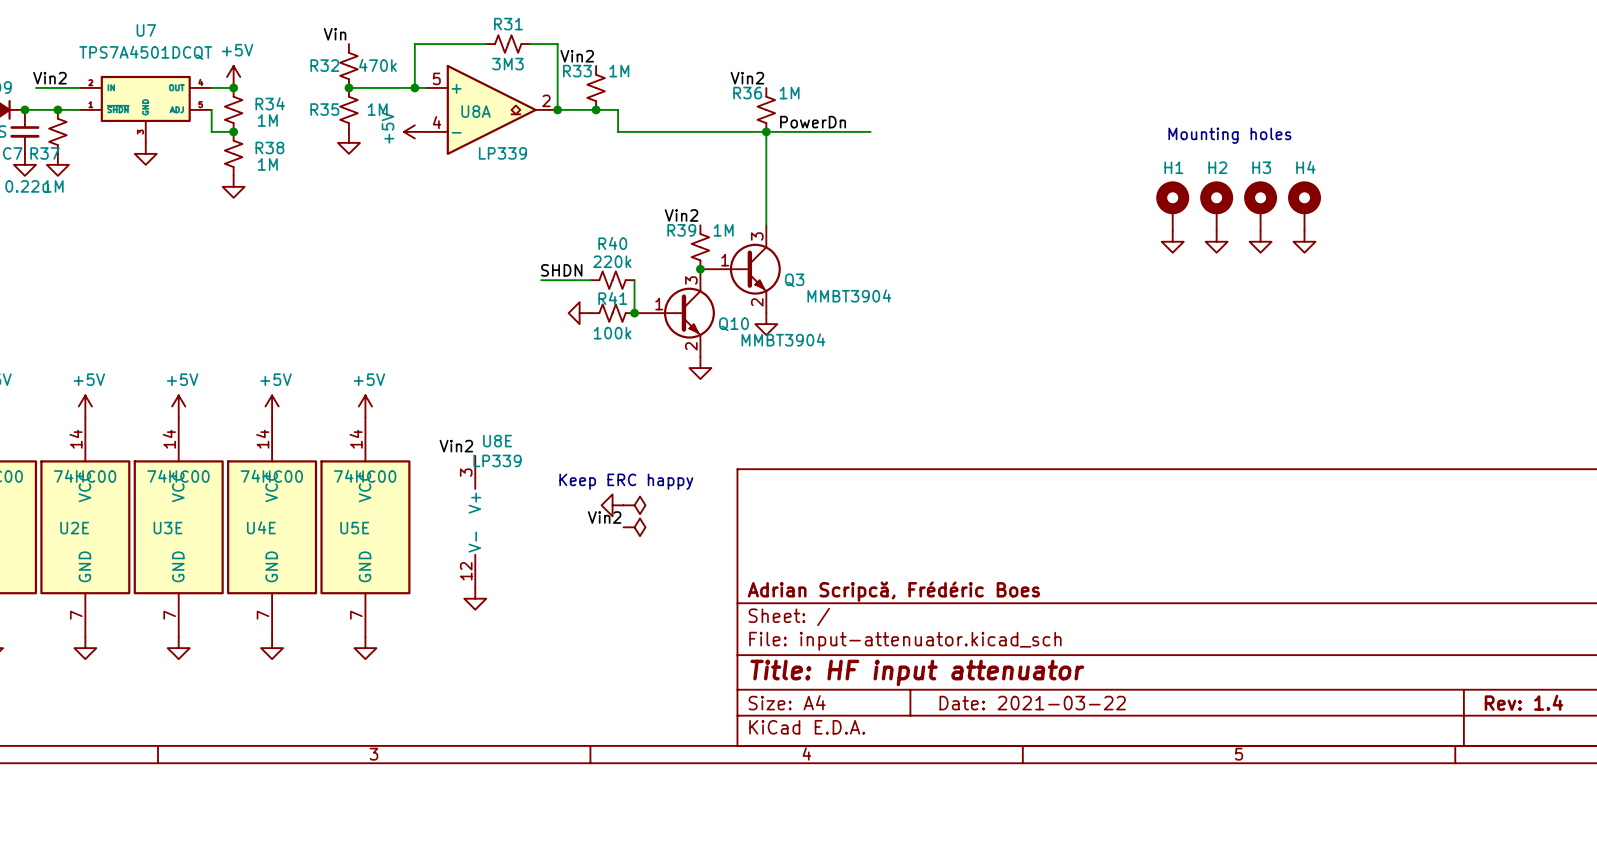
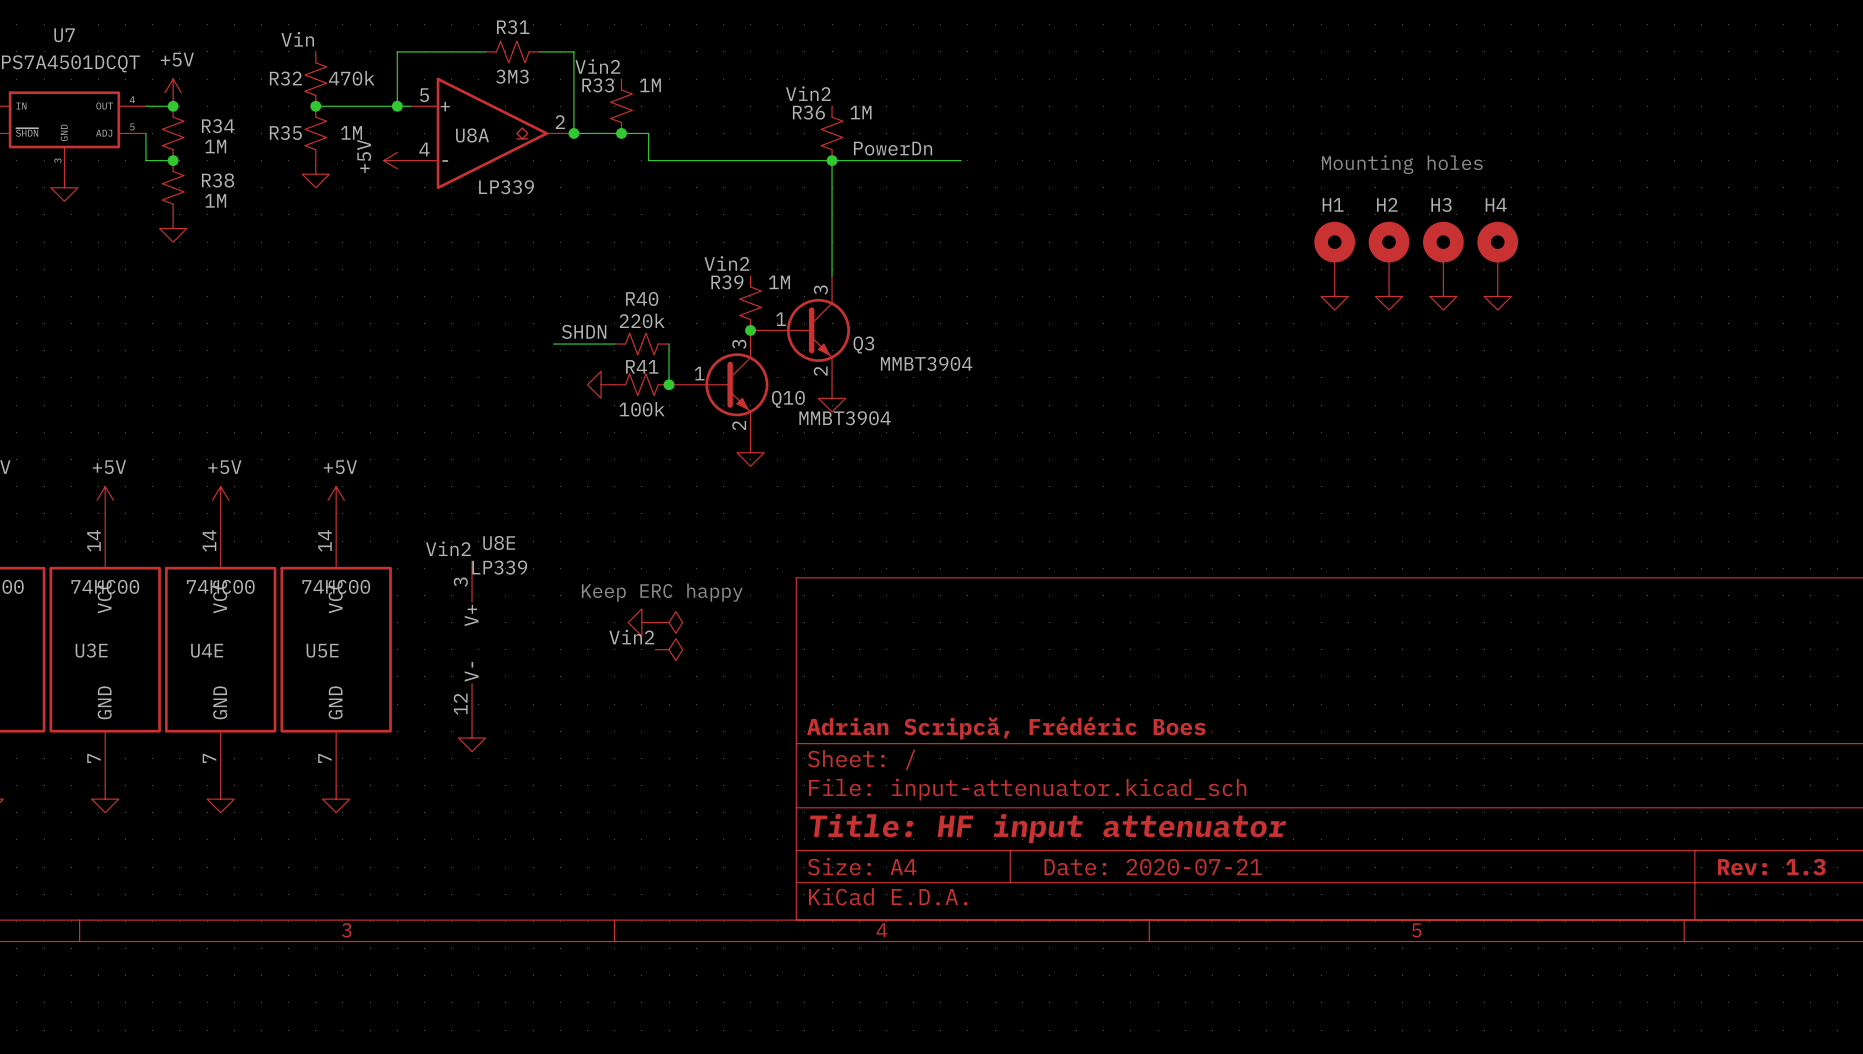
title block: Rev: 1.4 (1523, 702) -> Rev: 1.3 (1771, 867)
title block: Date: 2021-03-22 (1032, 703) -> Date: 2020-07-21 (1153, 867)

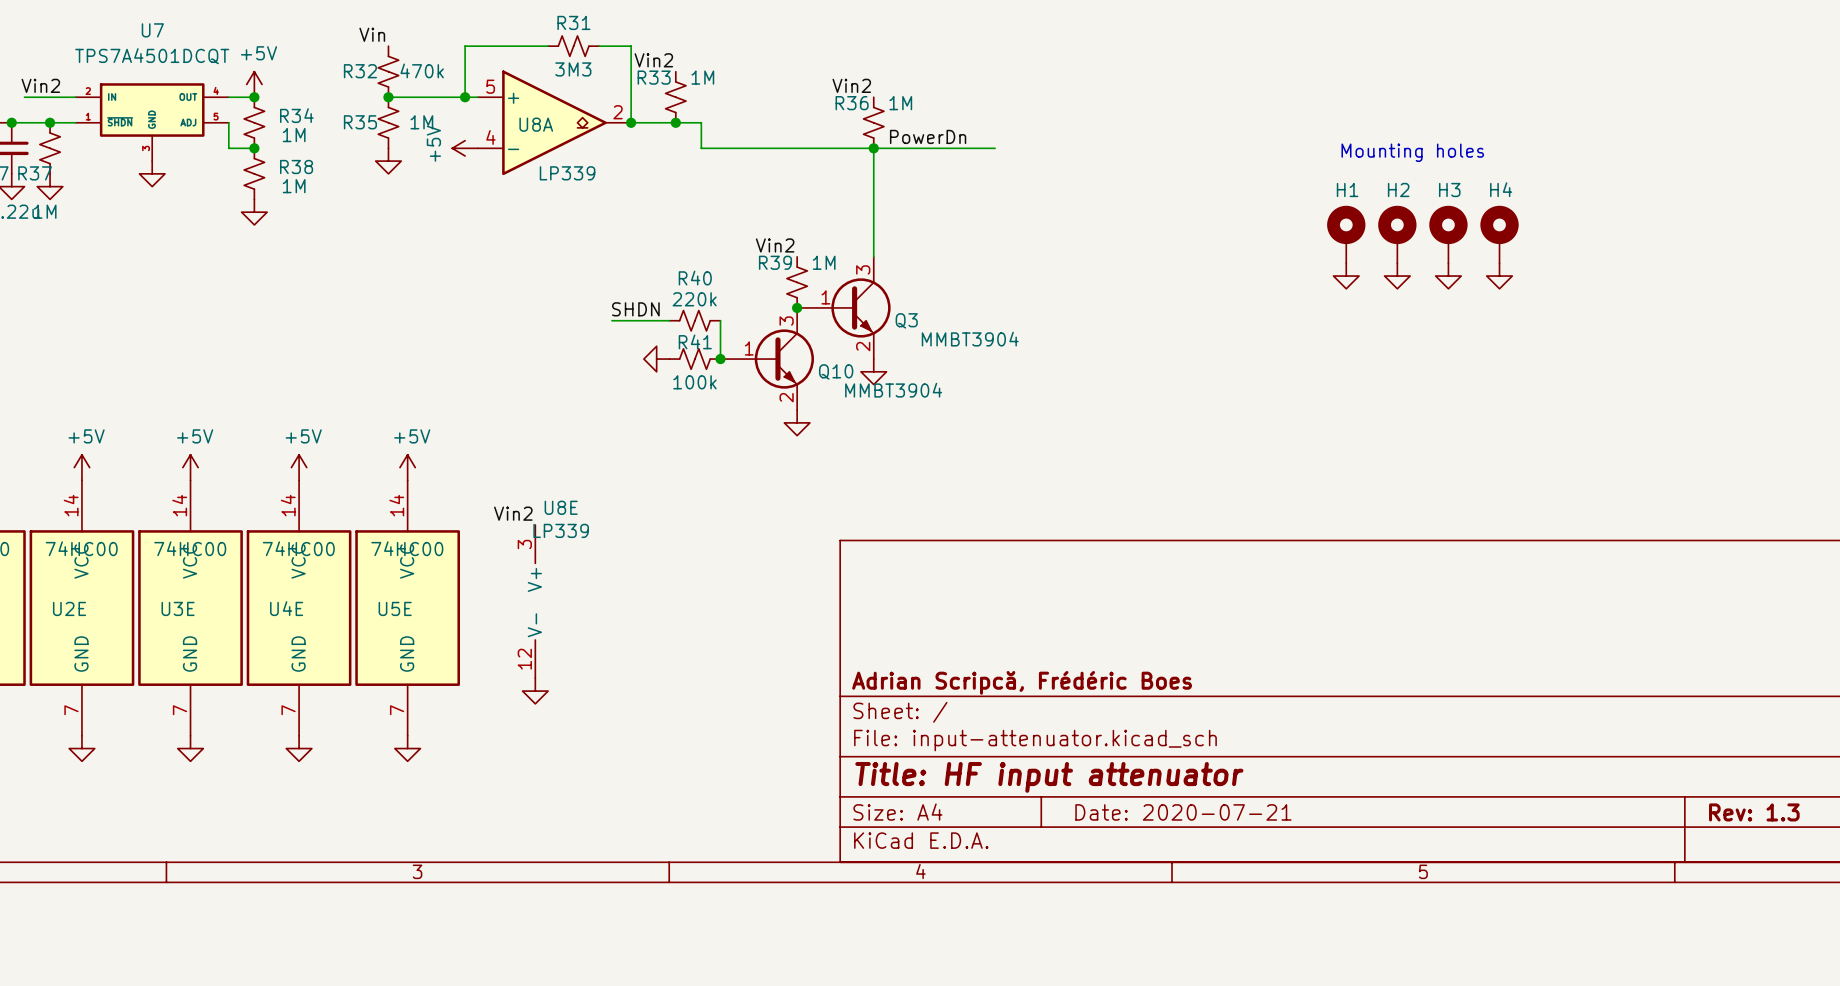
text: Keep ERC happy (662, 592) -> none
power symbol: (641, 622) -> none
power symbol: (669, 622) -> none
label: Vin2 (631, 637) -> none
power symbol: (669, 649) -> none

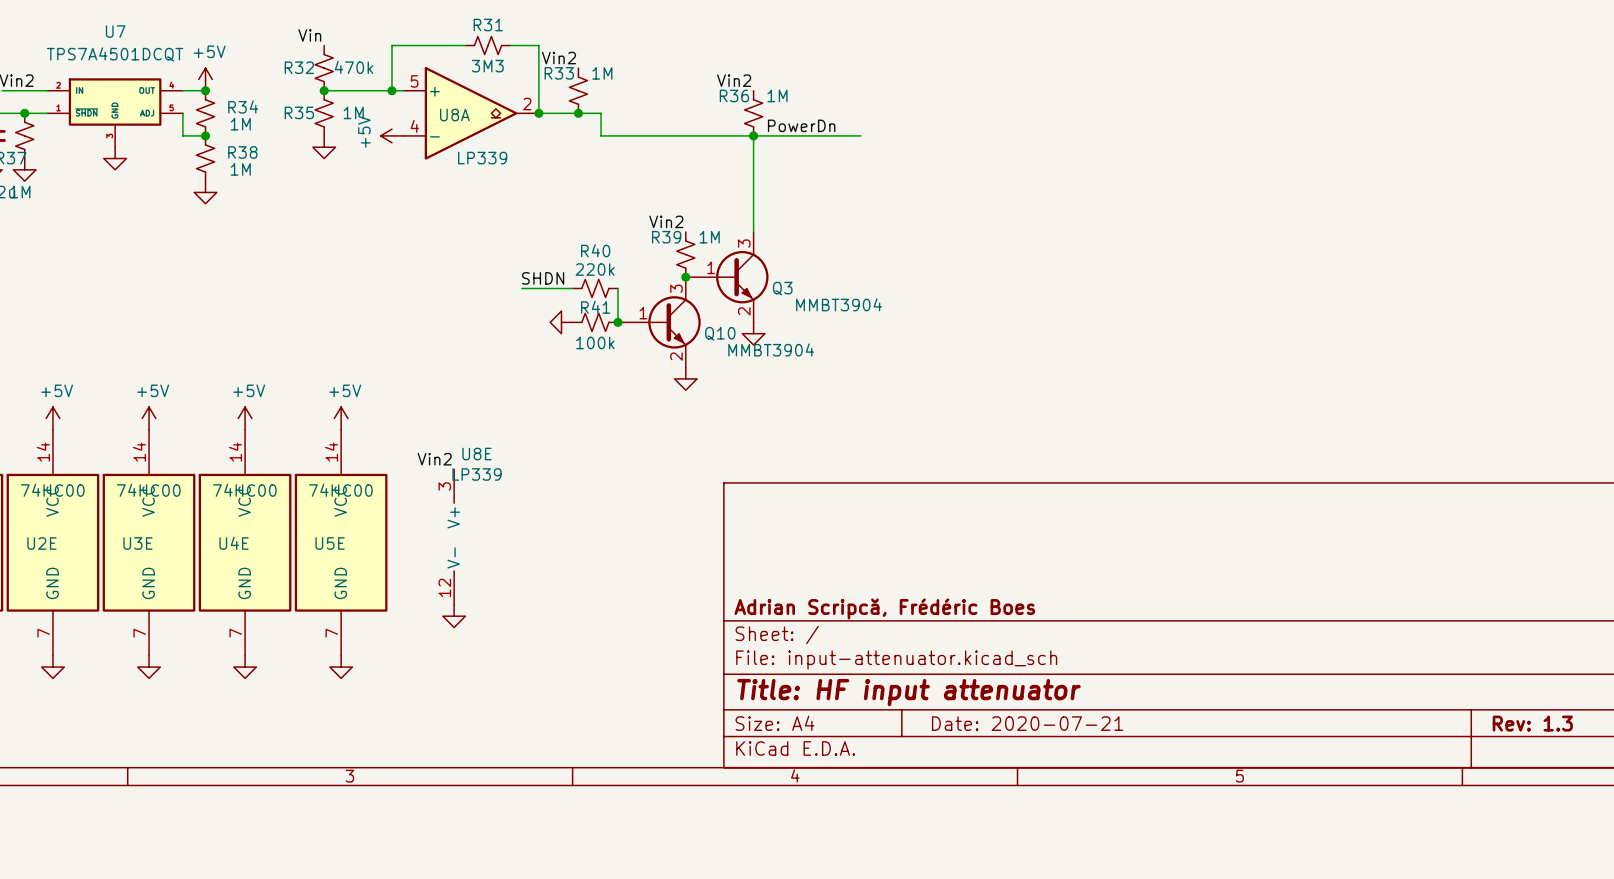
text: Mounting holes (1412, 152) -> none
H1: (1346, 234) -> none
H2: (1397, 234) -> none
H3: (1448, 234) -> none
H4: (1499, 234) -> none
power symbol: (1346, 276) -> none
power symbol: (1397, 276) -> none
power symbol: (1448, 276) -> none
power symbol: (1499, 276) -> none

